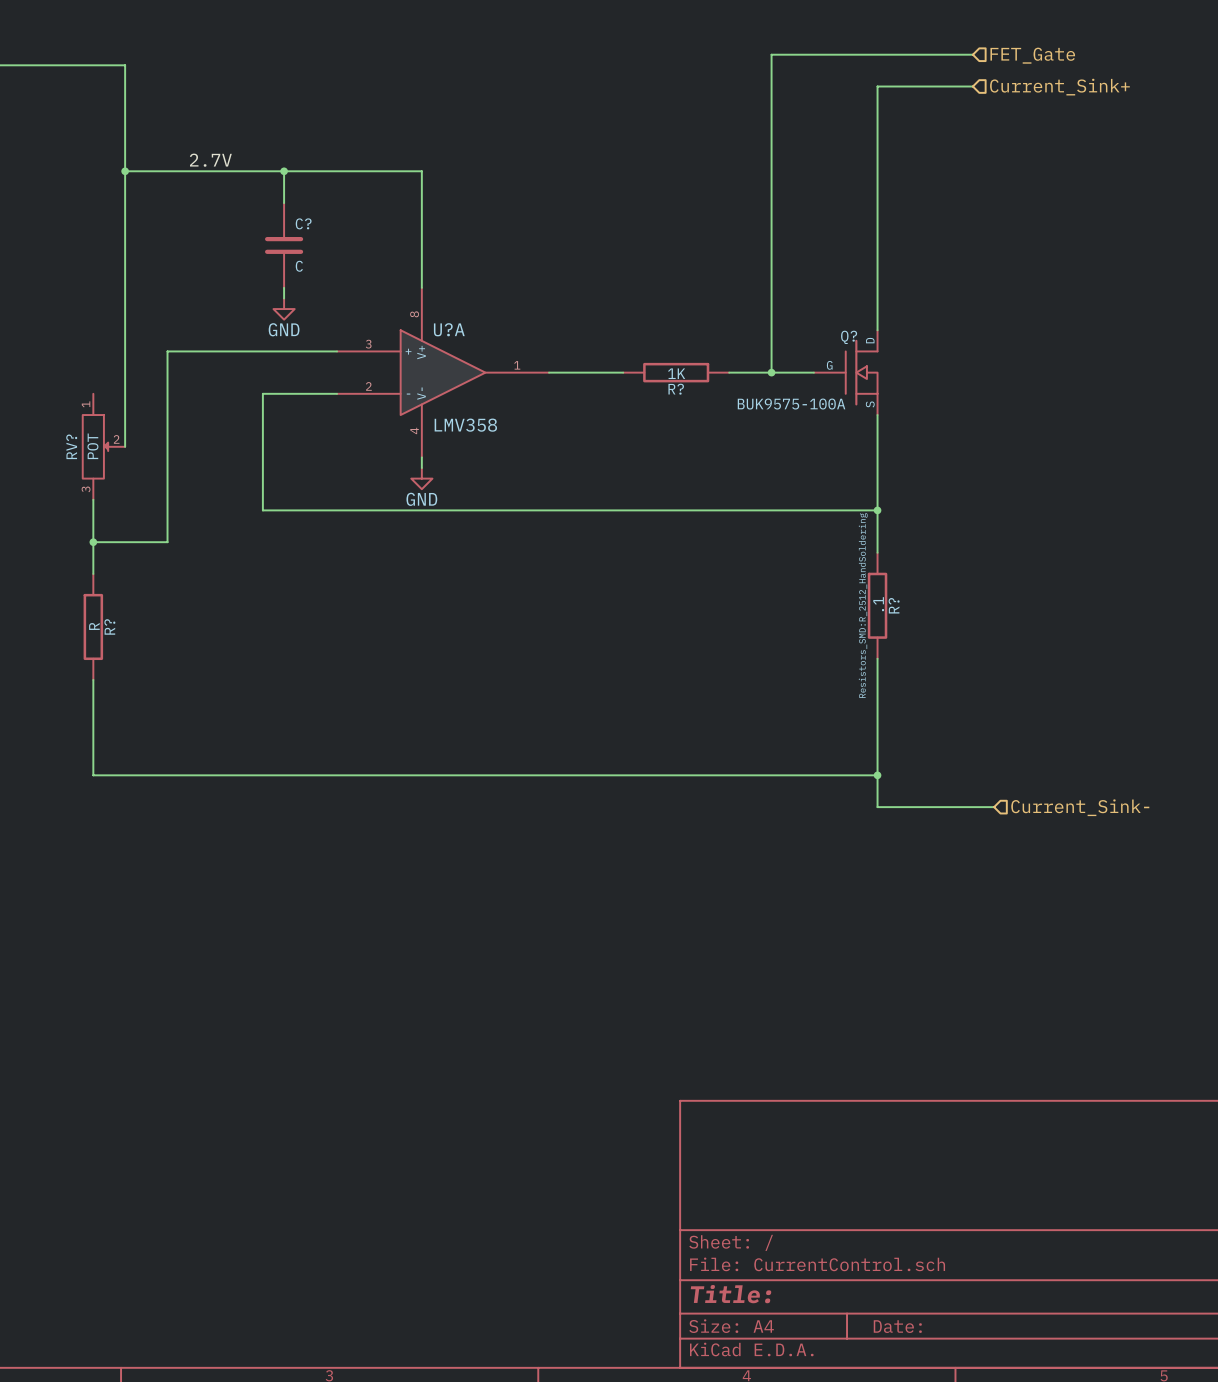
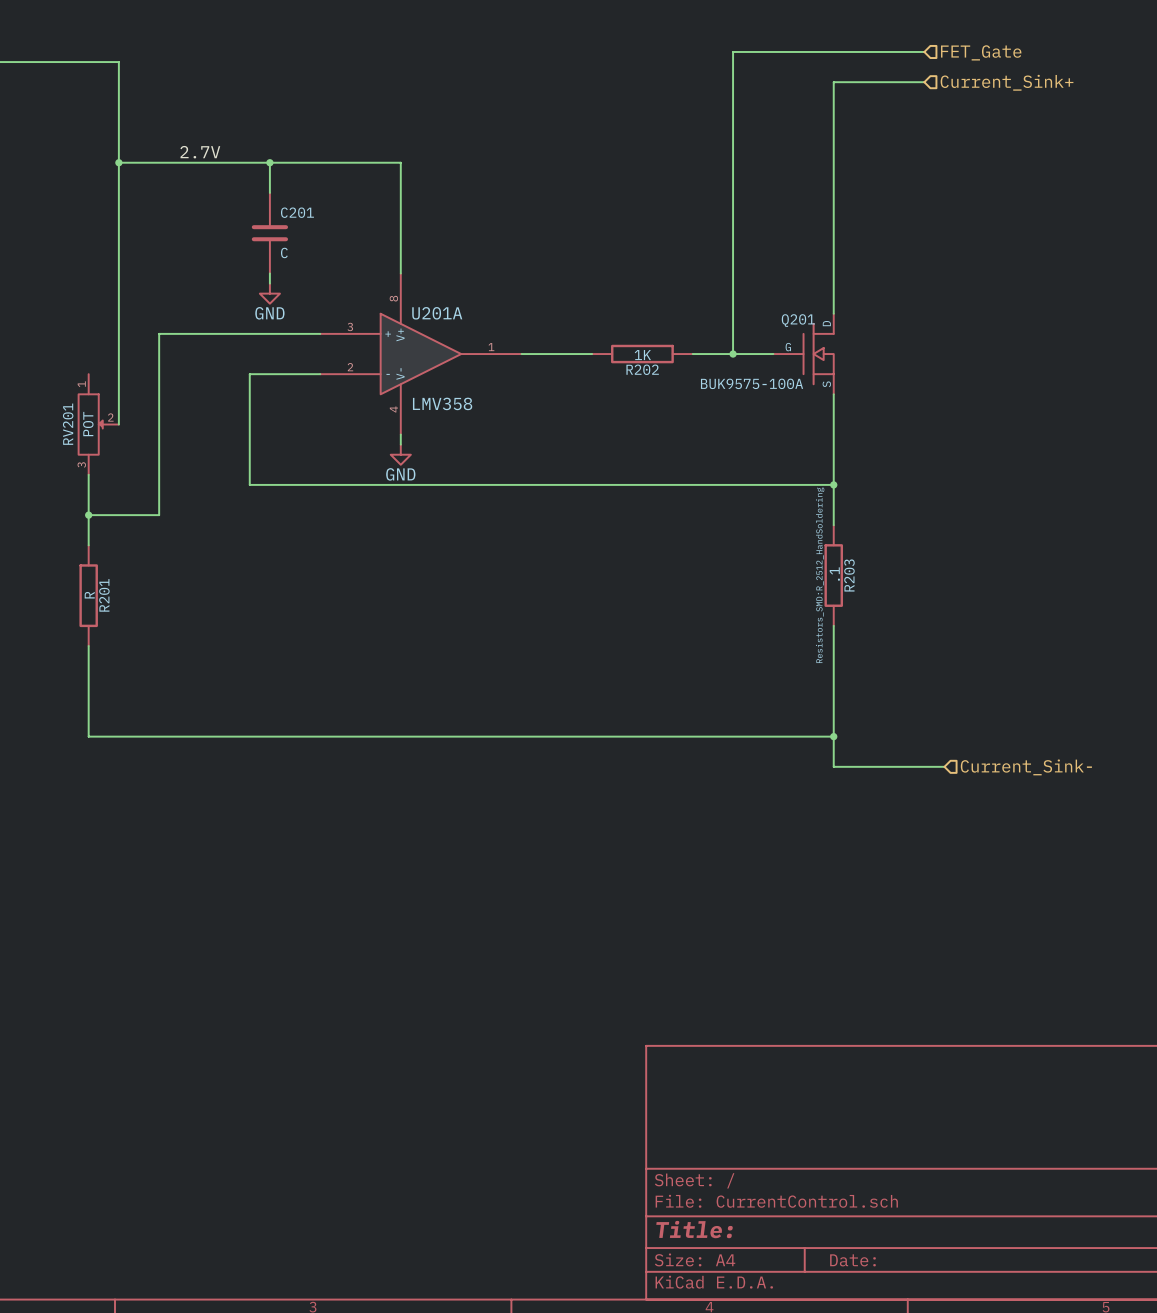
C? name: C? (303, 223) -> C201 (297, 212)
U?A name: U?A (449, 329) -> U201A (437, 313)
Q? name: Q? (849, 337) -> Q201 (798, 320)
R? name: R? (676, 389) -> R202 (642, 369)
RV? name: RV? (71, 446) -> RV201 (68, 424)
R? name: R? (894, 605) -> R203 (849, 575)
R? name: R? (109, 626) -> R201 (104, 595)

